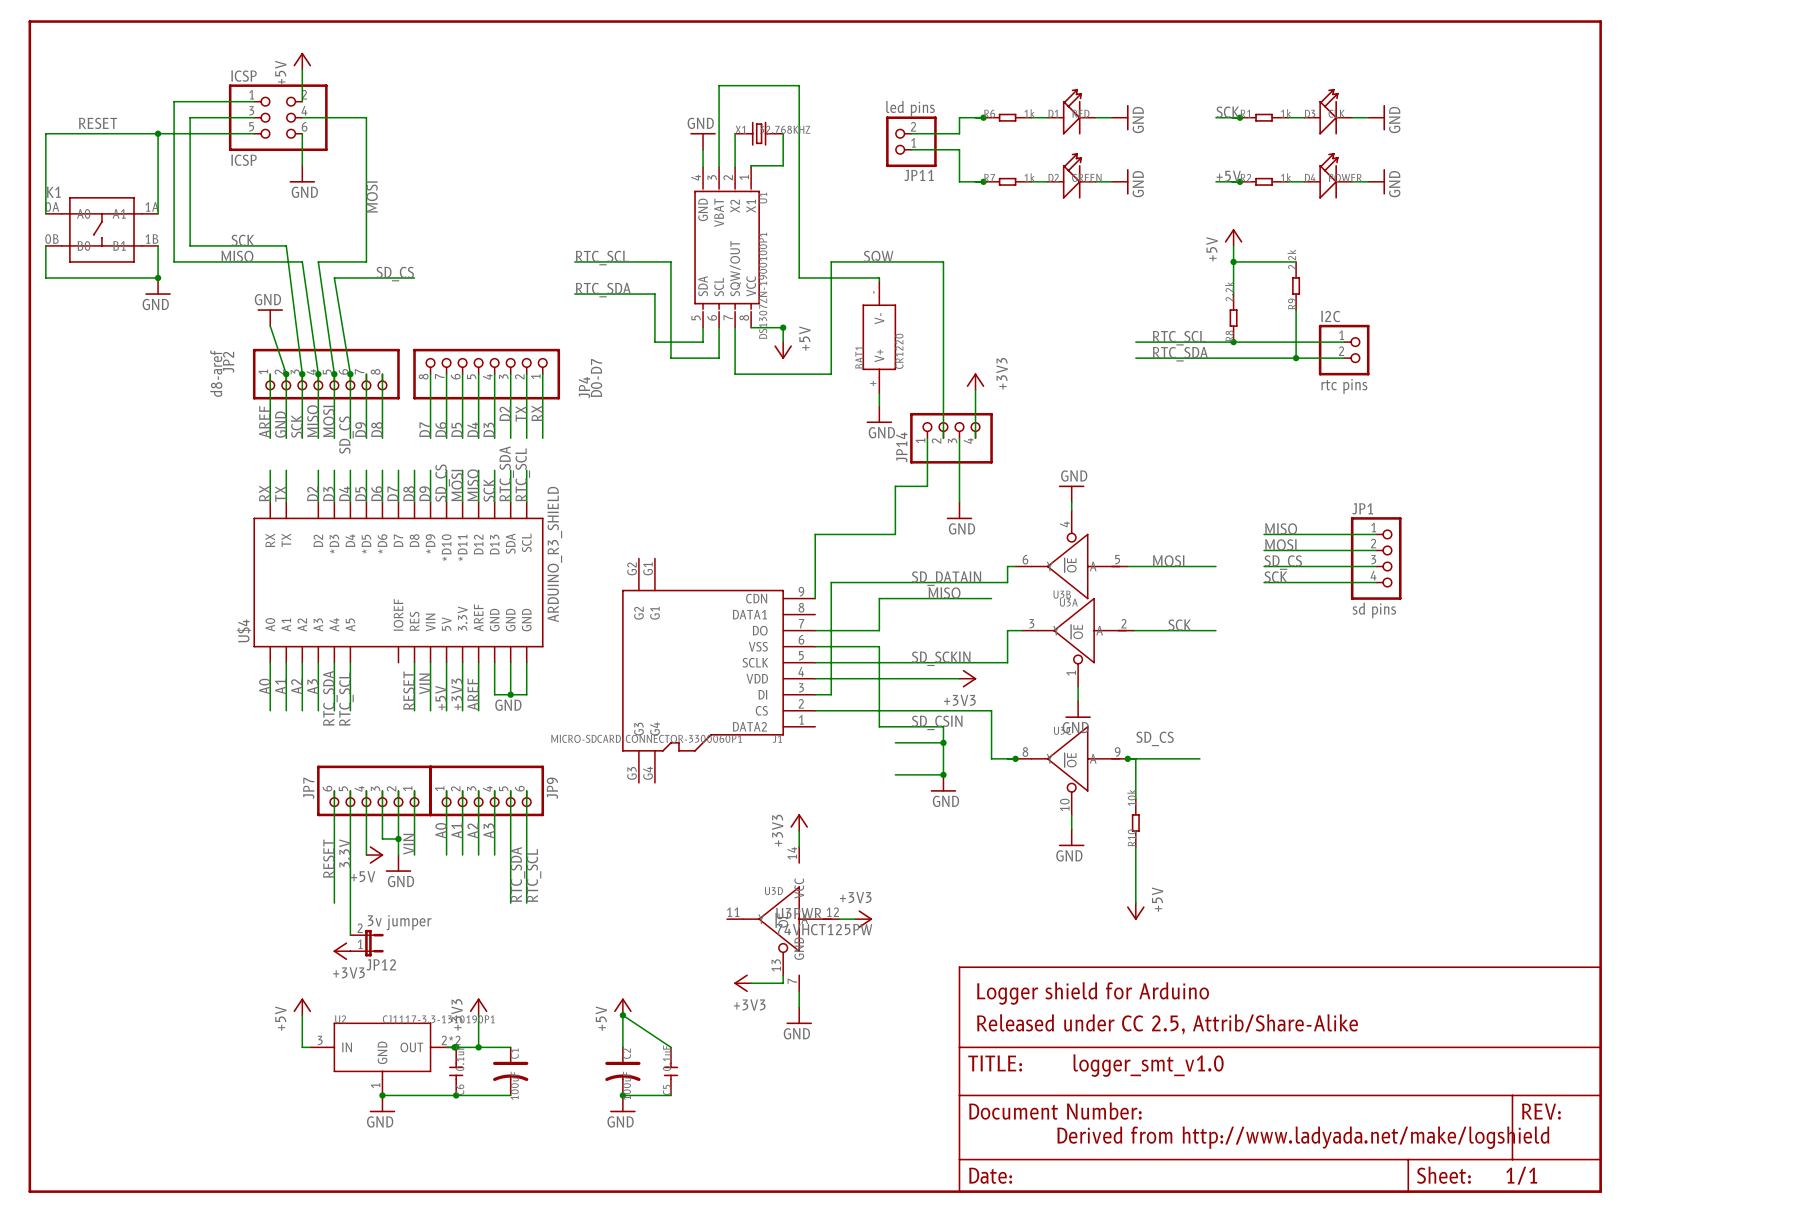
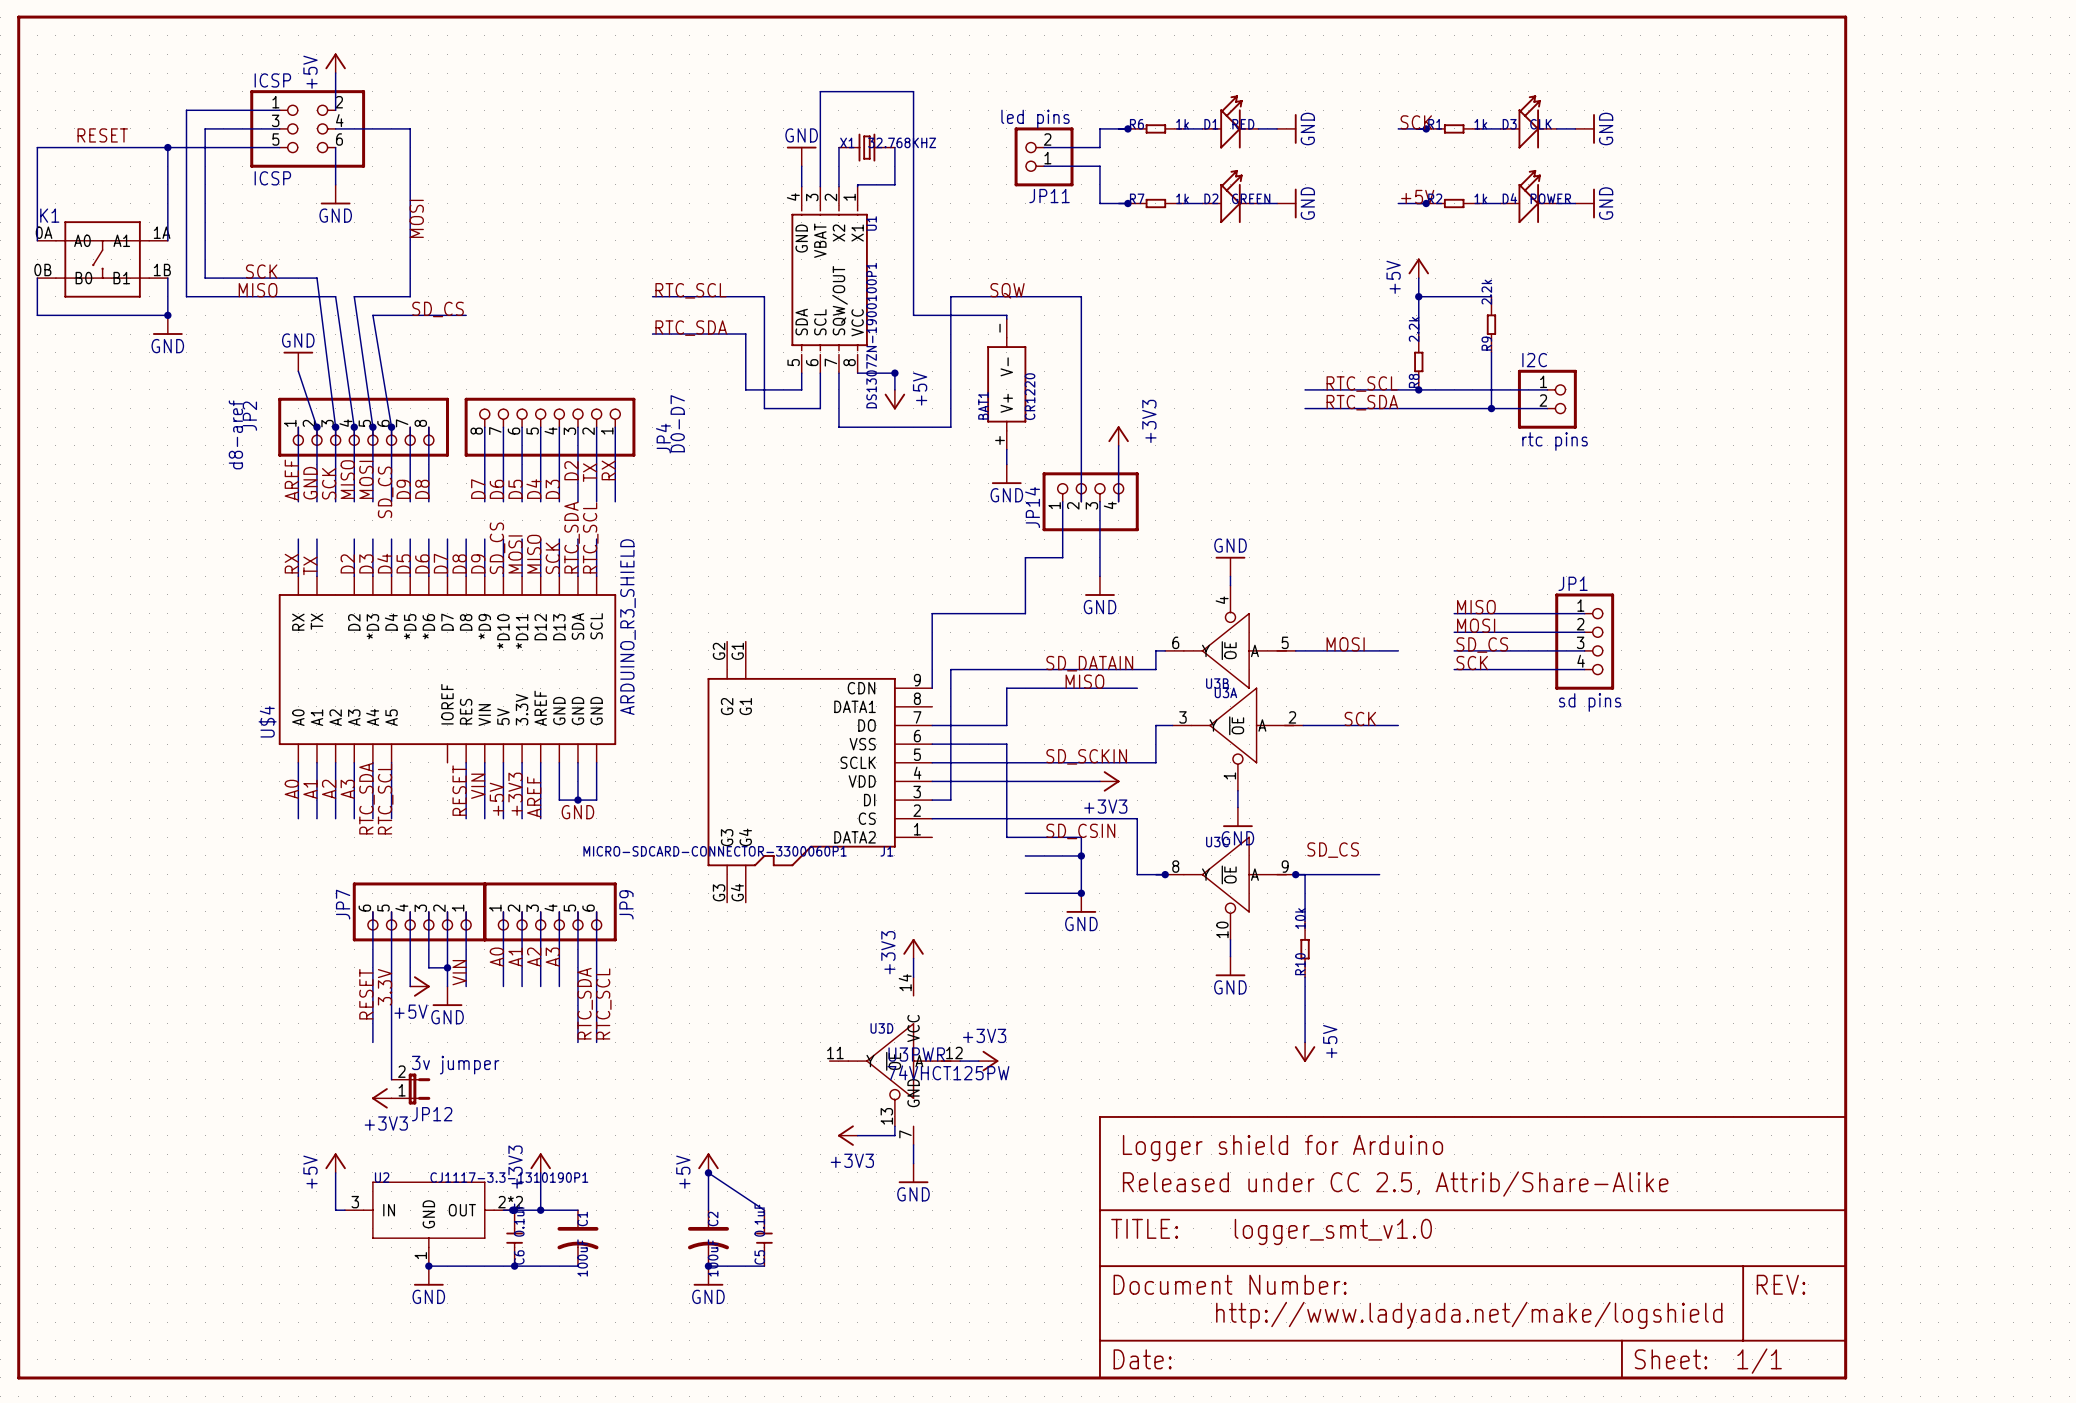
text: Derived from http://www.ladyada.net/make/logshield (1303, 1137) -> http://www.ladyada.net/make/logshield (1469, 1315)

